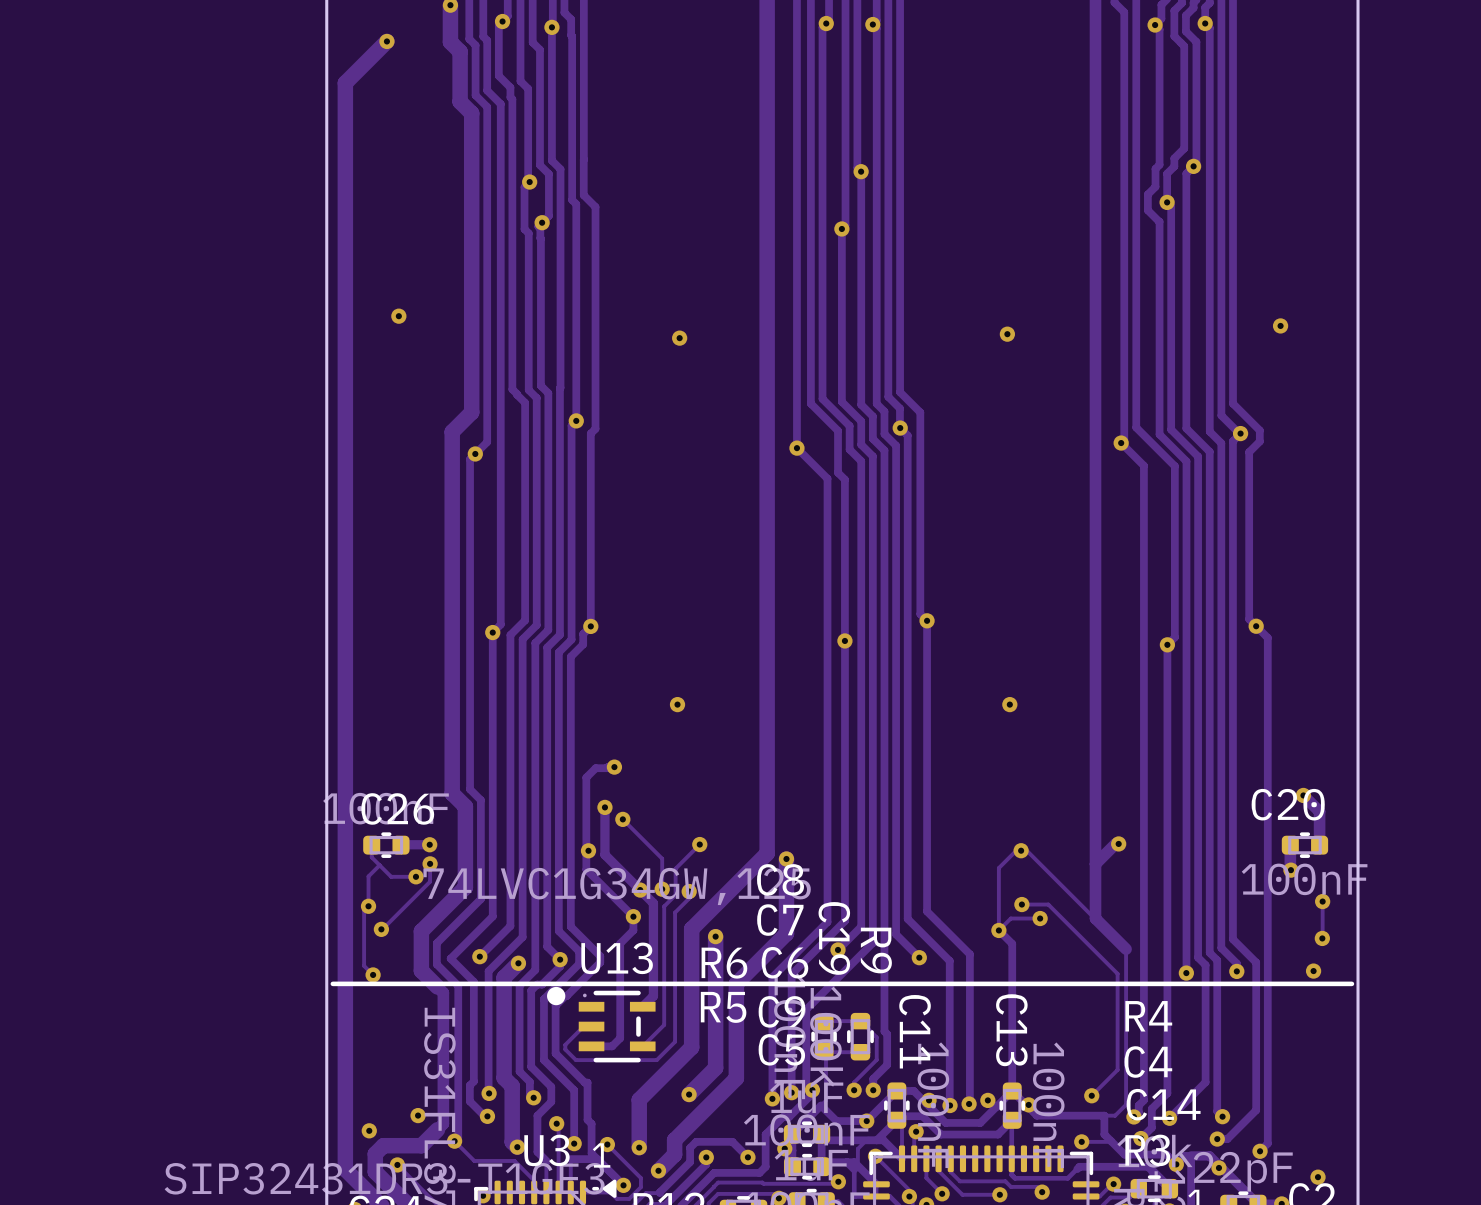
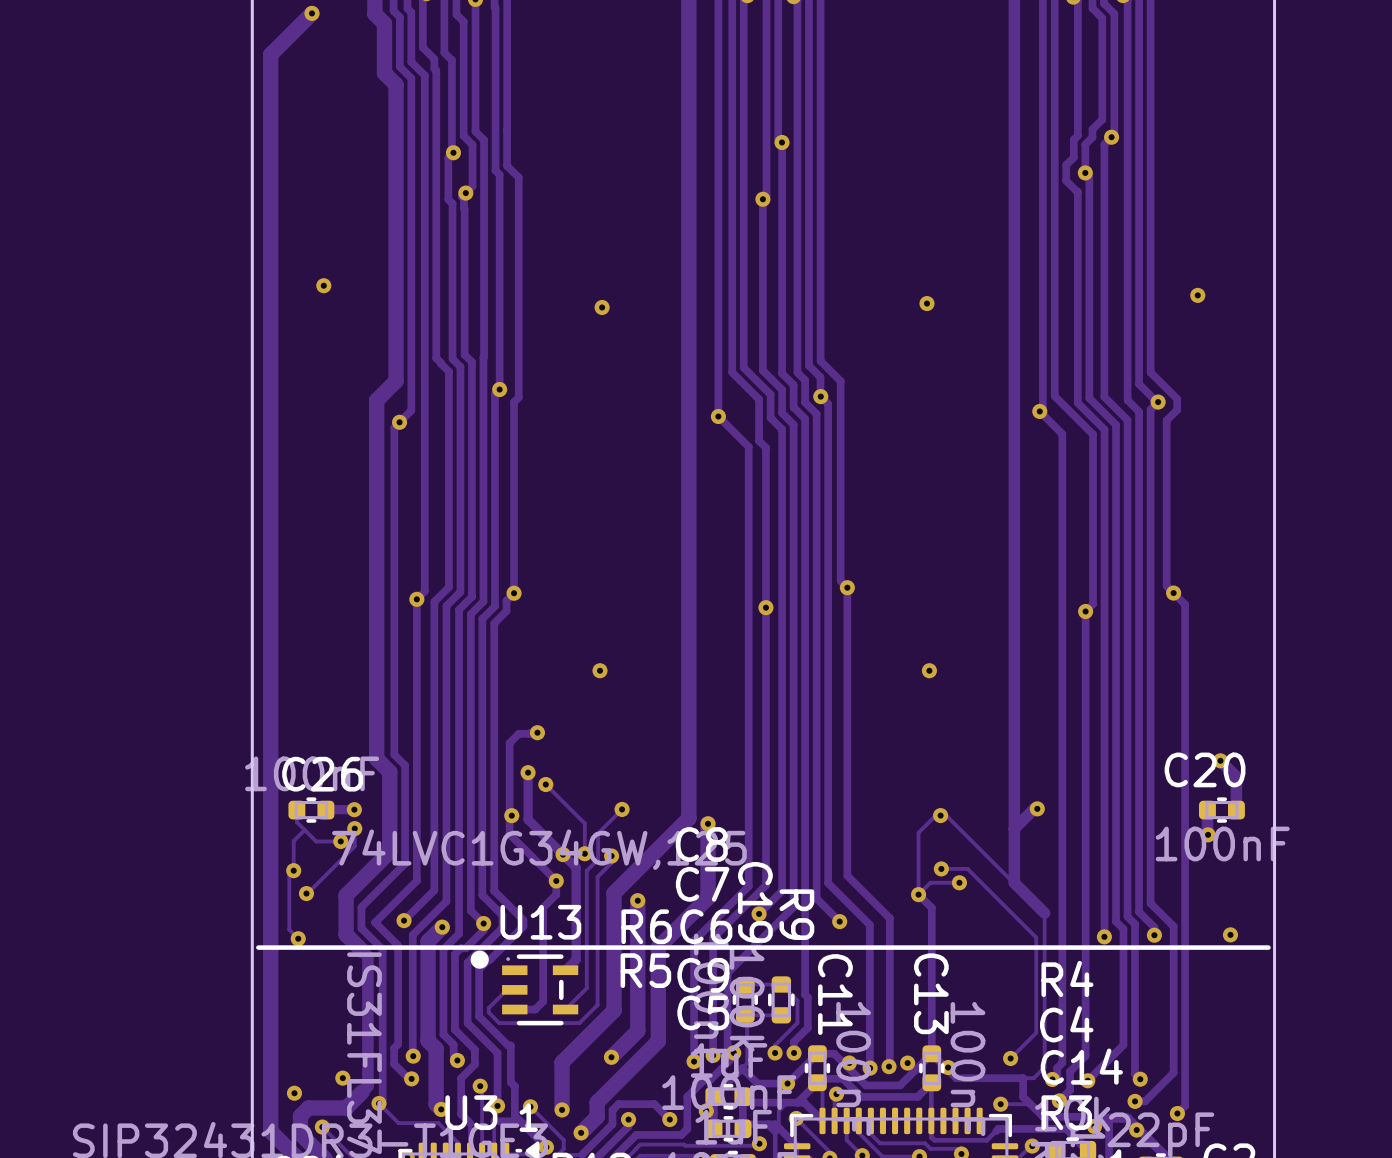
track: (1322, 901) (1322, 938) -> none
via: (1322, 901) -> none
via: (1322, 938) -> none
via: (1318, 1177) -> none

